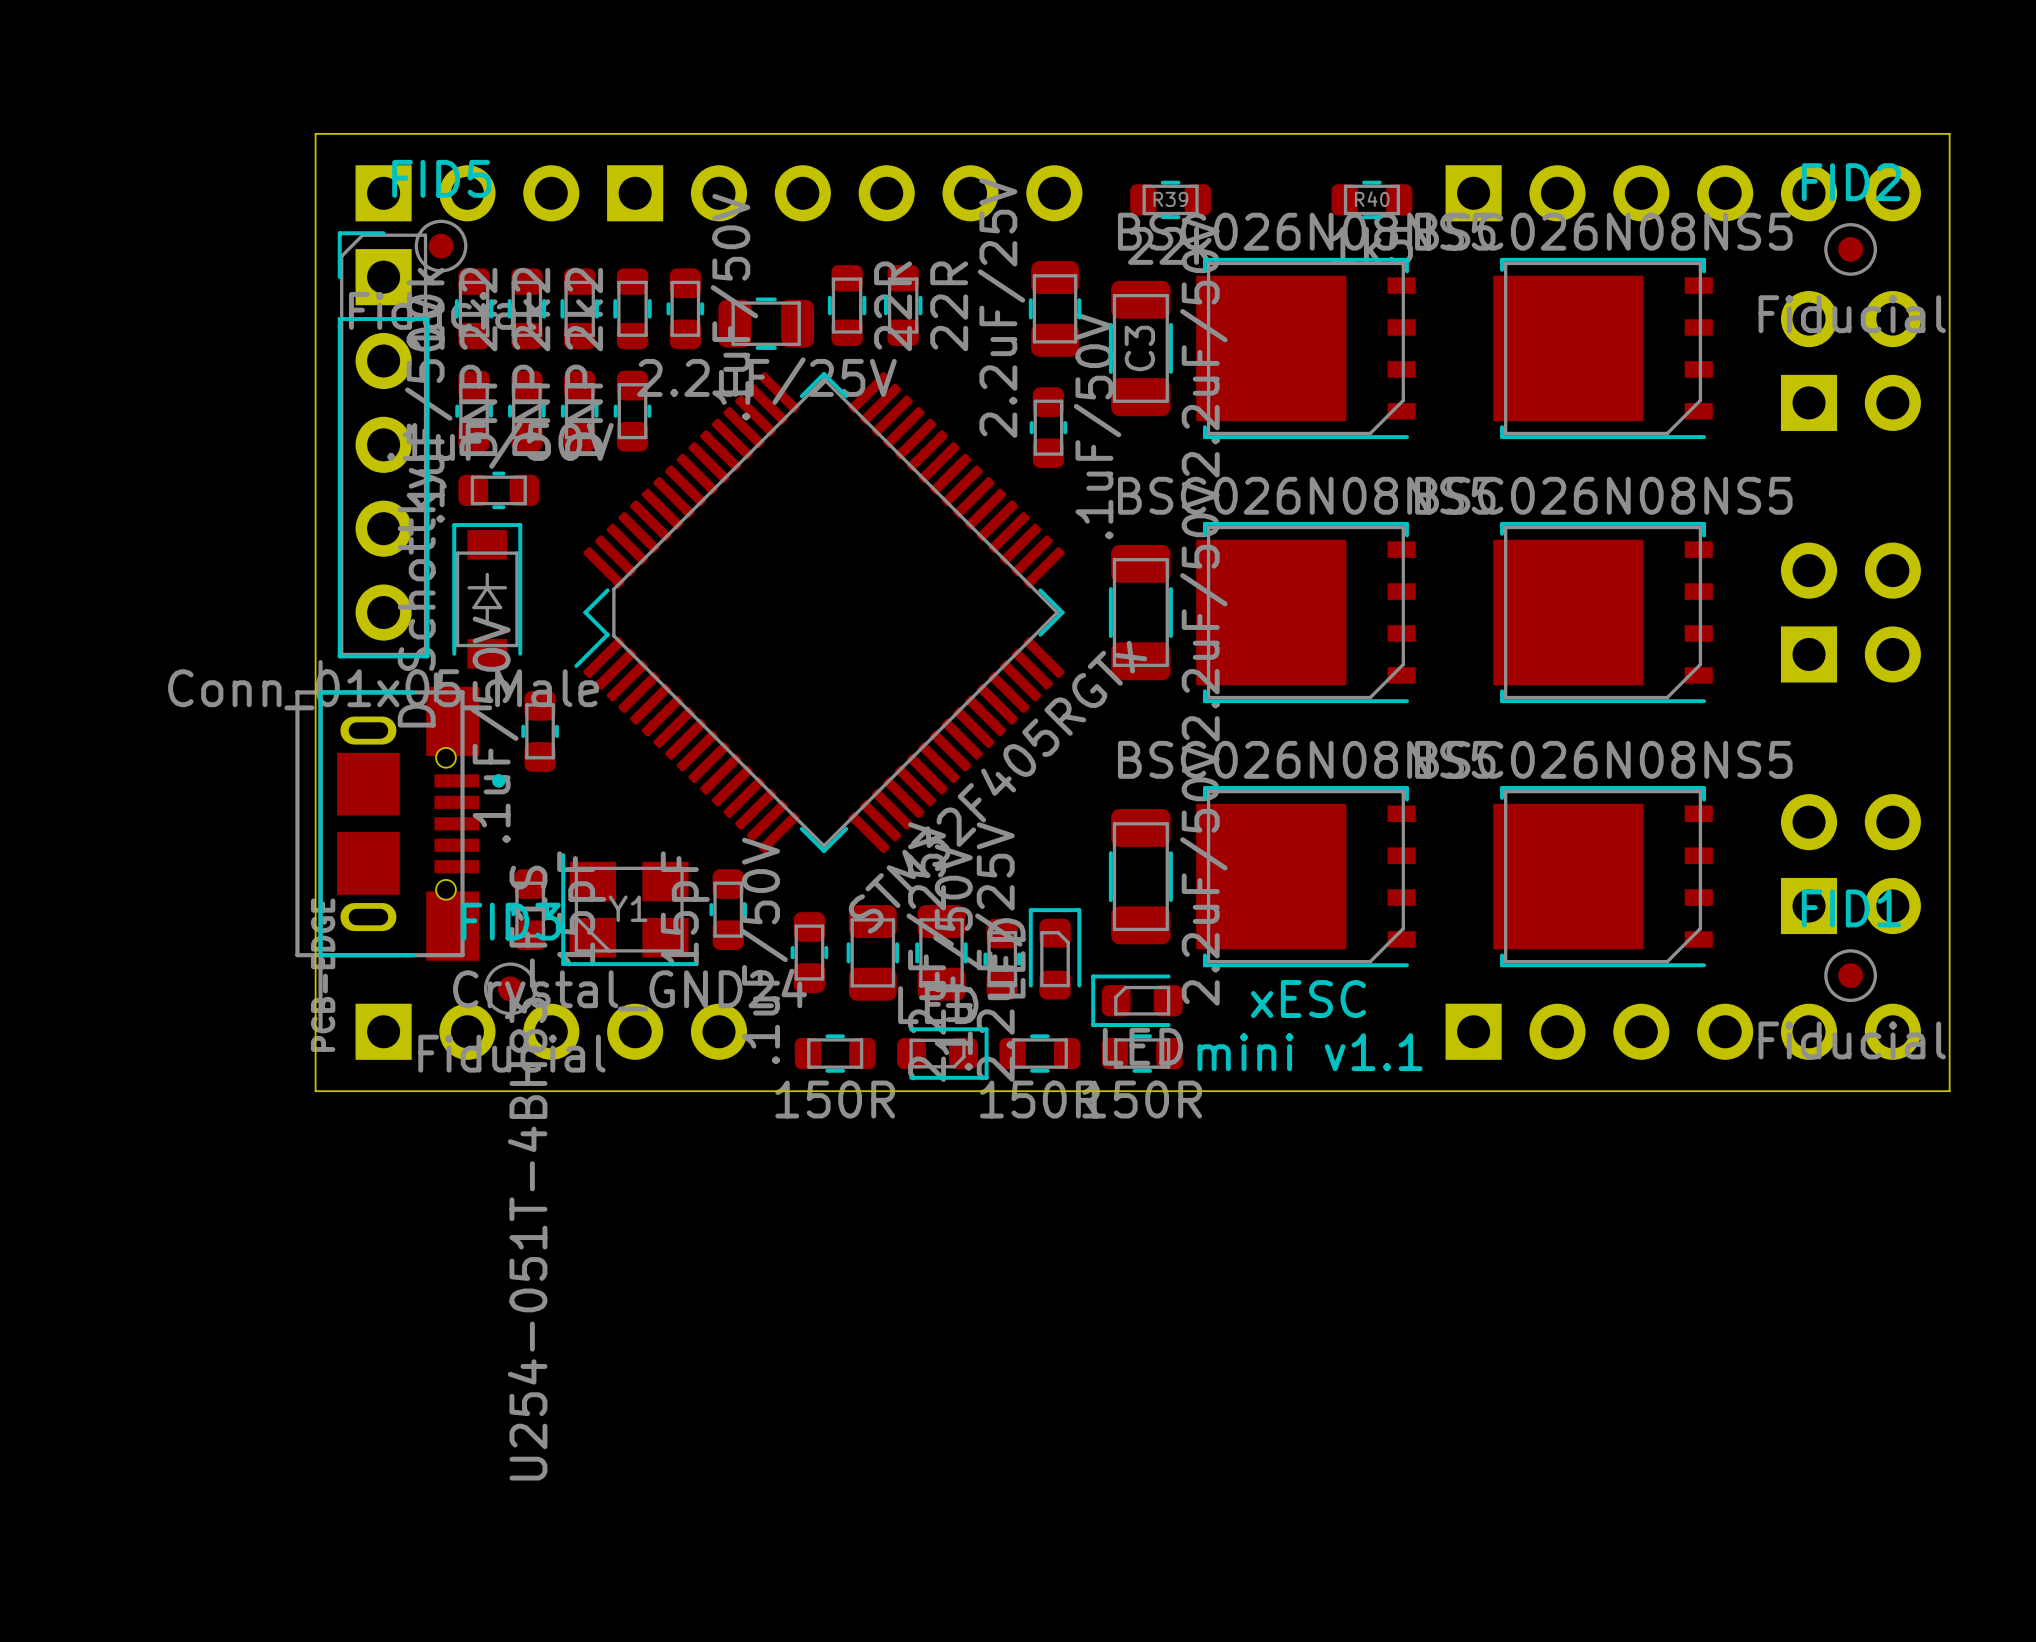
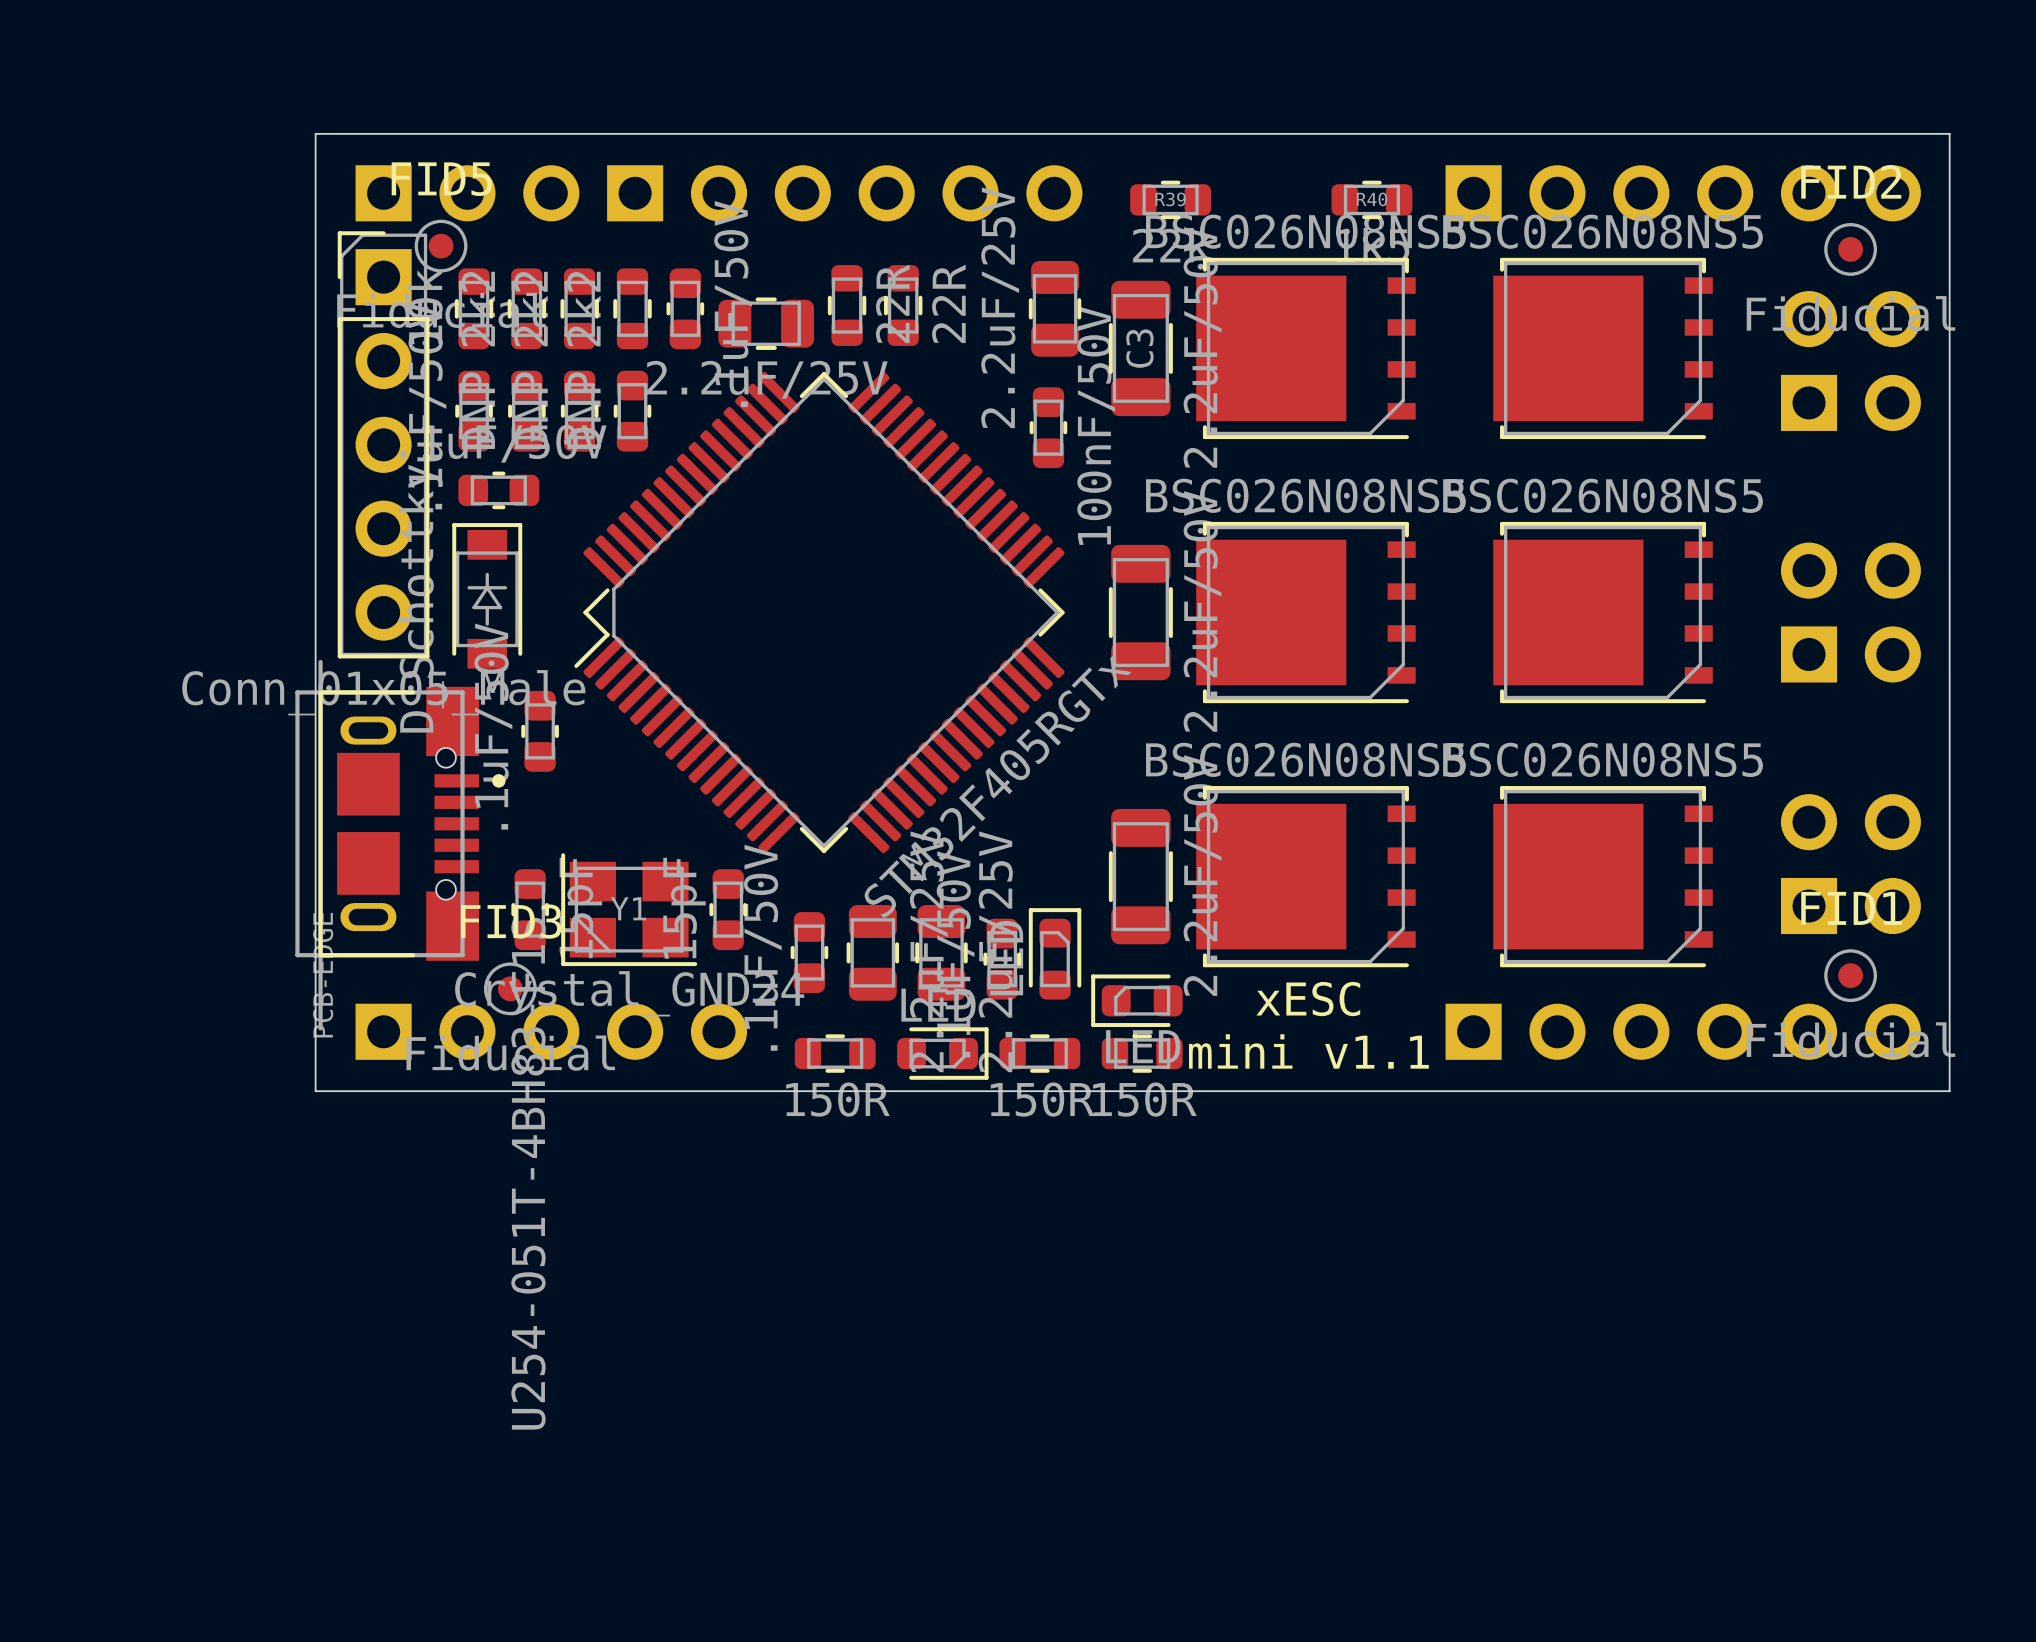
part value: .1uF/50V (1097, 426) -> 100nF/50V (1096, 425)

